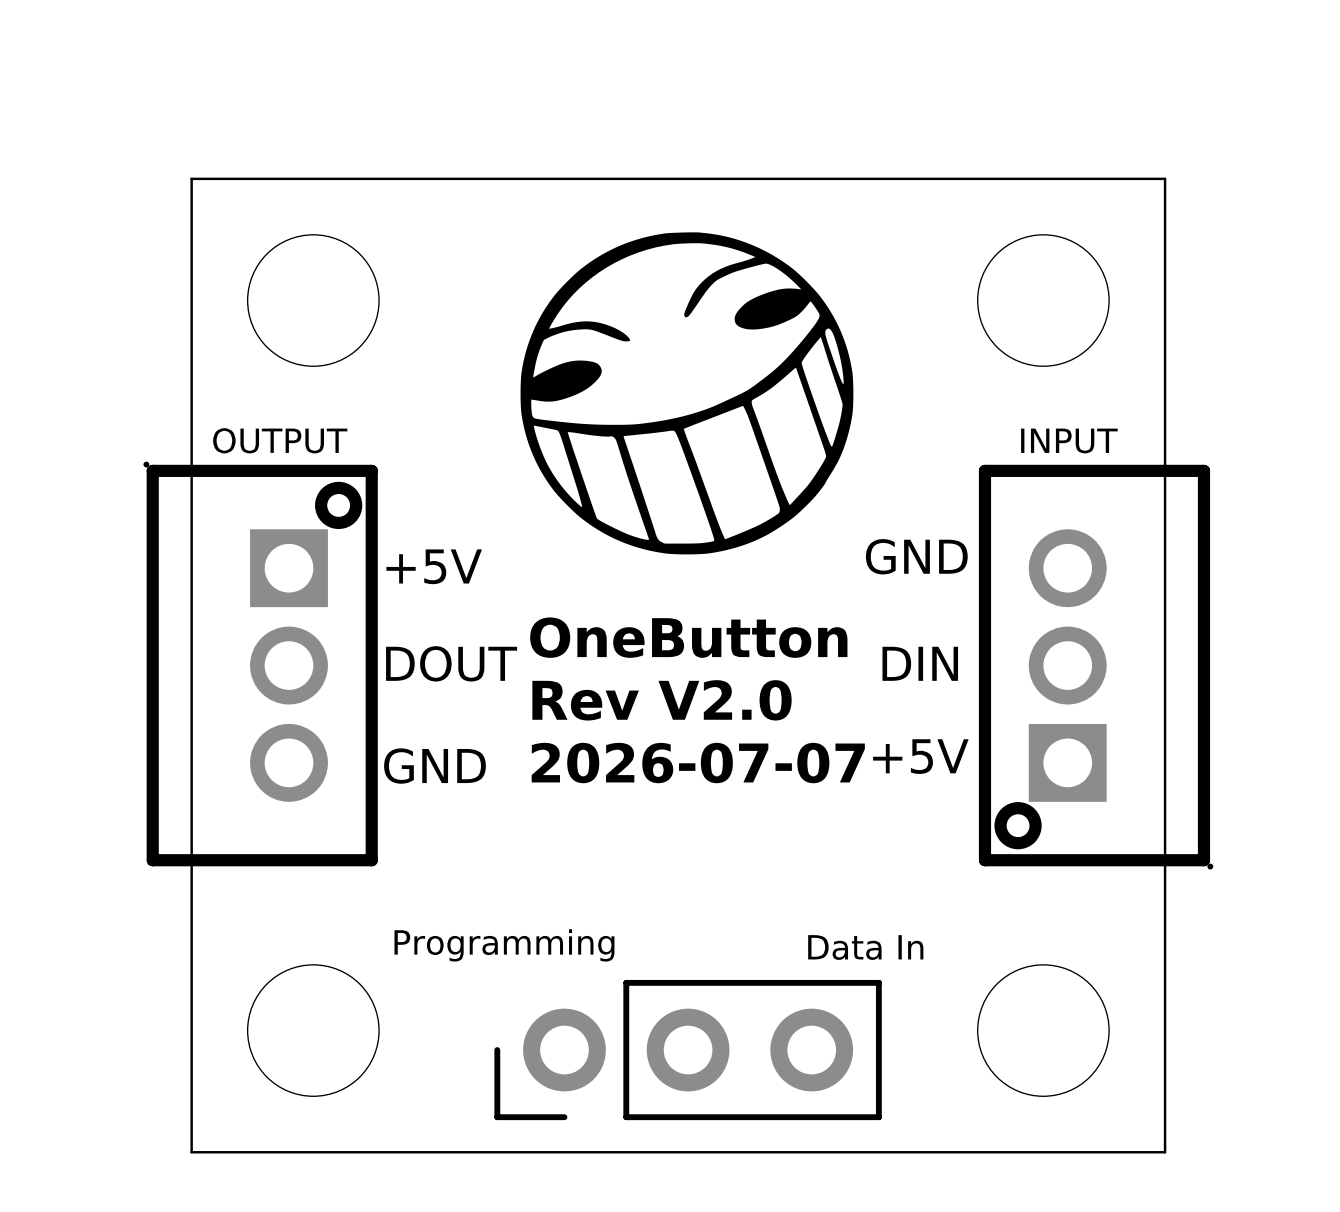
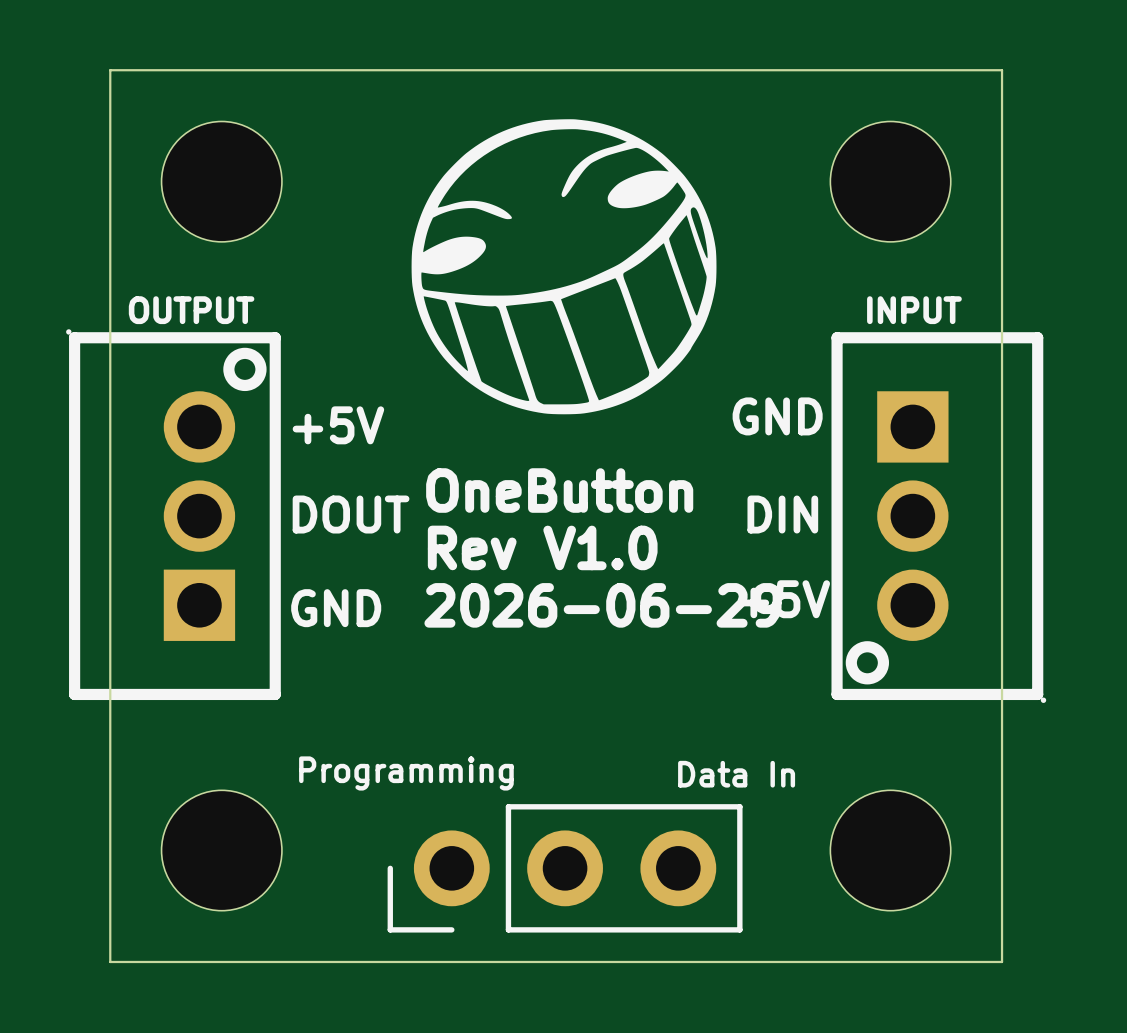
part footprint: [143, 461, 378, 867] -> [66, 329, 281, 701]
part footprint: [978, 464, 1214, 870] -> [831, 332, 1047, 703]
text: Rev V2.0 (662, 700) -> Rev V1.0 (542, 547)
text: 2026-07-07 (698, 763) -> 2026-06-29 (603, 605)

